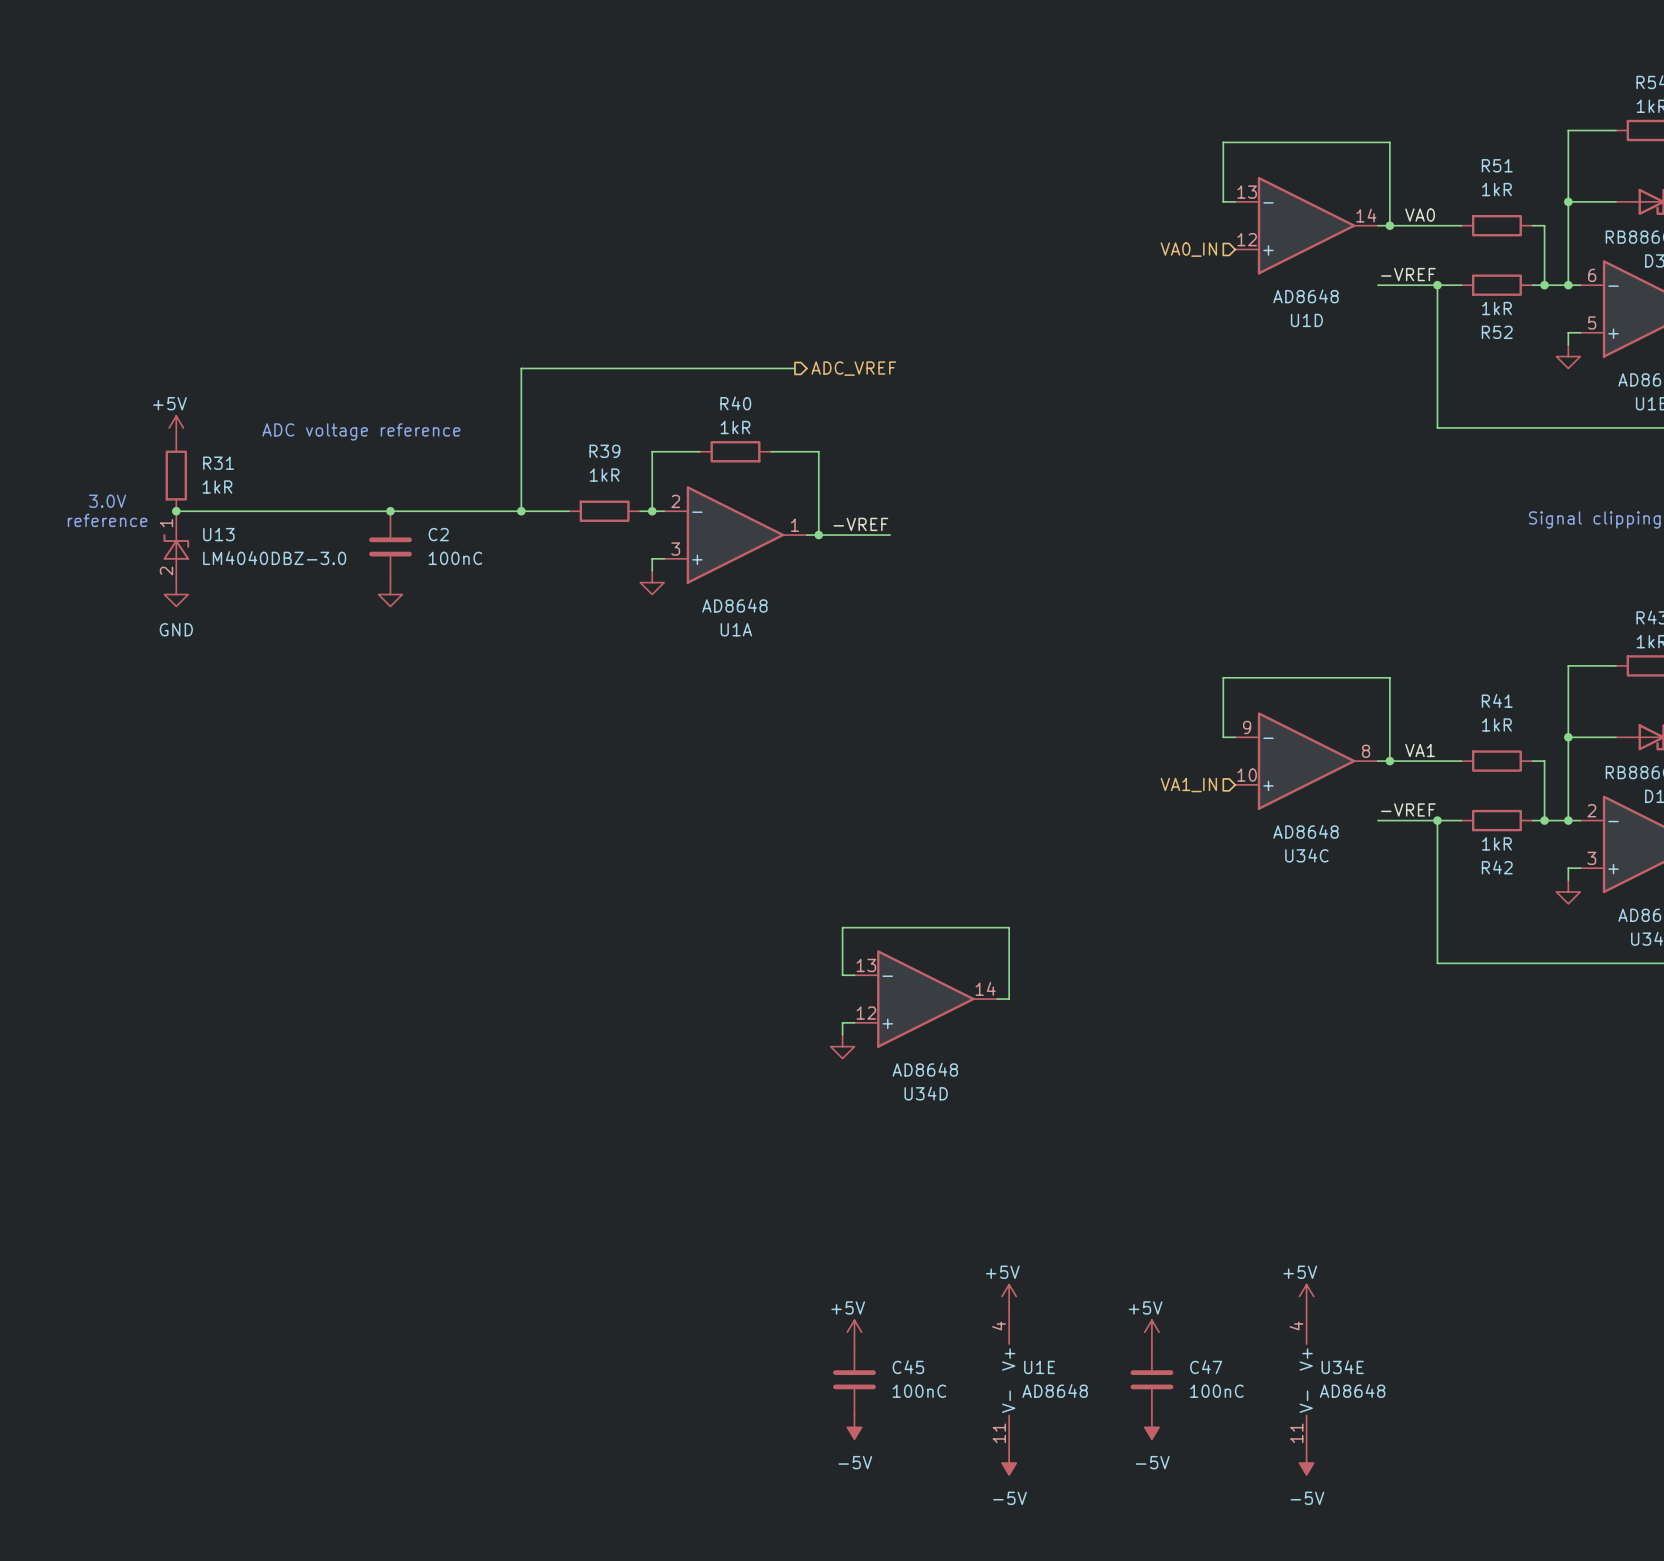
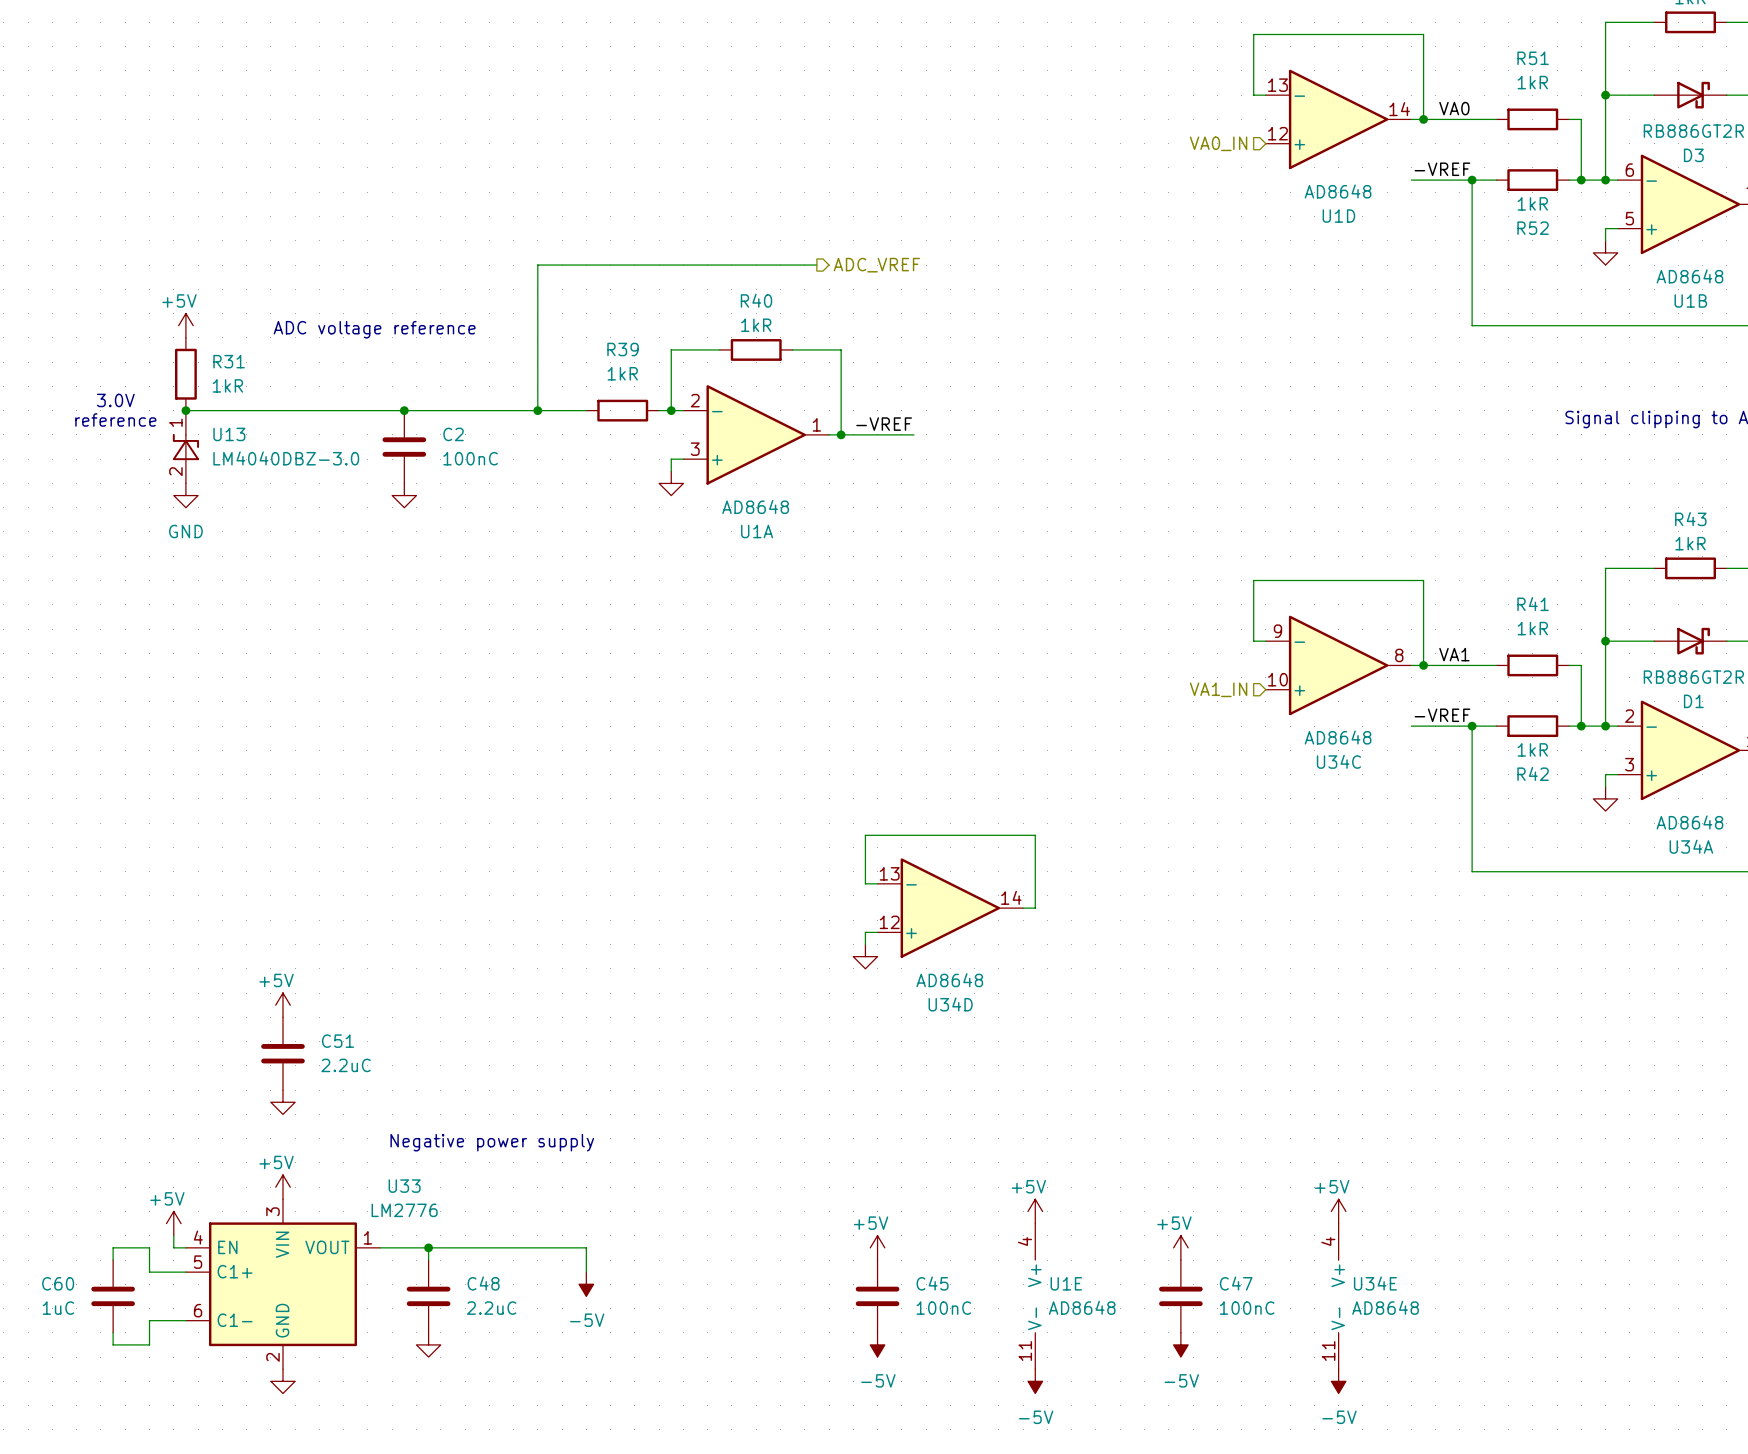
power symbol: none -> +5V (282, 1005)
C51: none -> 2.2uC (282, 1053)
power symbol: none -> (282, 1102)
text: none -> Negative power supply (492, 1142)
power symbol: none -> +5V (282, 1187)
power symbol: none -> +5V (173, 1223)
wire: none -> (173, 1235) (173, 1247) (185, 1247)
wire: none -> (380, 1247) (586, 1247) (586, 1272)
wire: none -> (428, 1247) (428, 1260)
junction: none -> (428, 1247)
wire: none -> (113, 1260) (113, 1247) (149, 1247) (149, 1272) (185, 1272)
U33: none -> LM2776 (282, 1284)
power symbol: none -> -5V (586, 1284)
C60: none -> 1uC (113, 1296)
C48: none -> 2.2uC (428, 1296)
wire: none -> (185, 1320) (149, 1320) (149, 1344) (113, 1344) (113, 1332)
power symbol: none -> (428, 1344)
power symbol: none -> (282, 1381)

